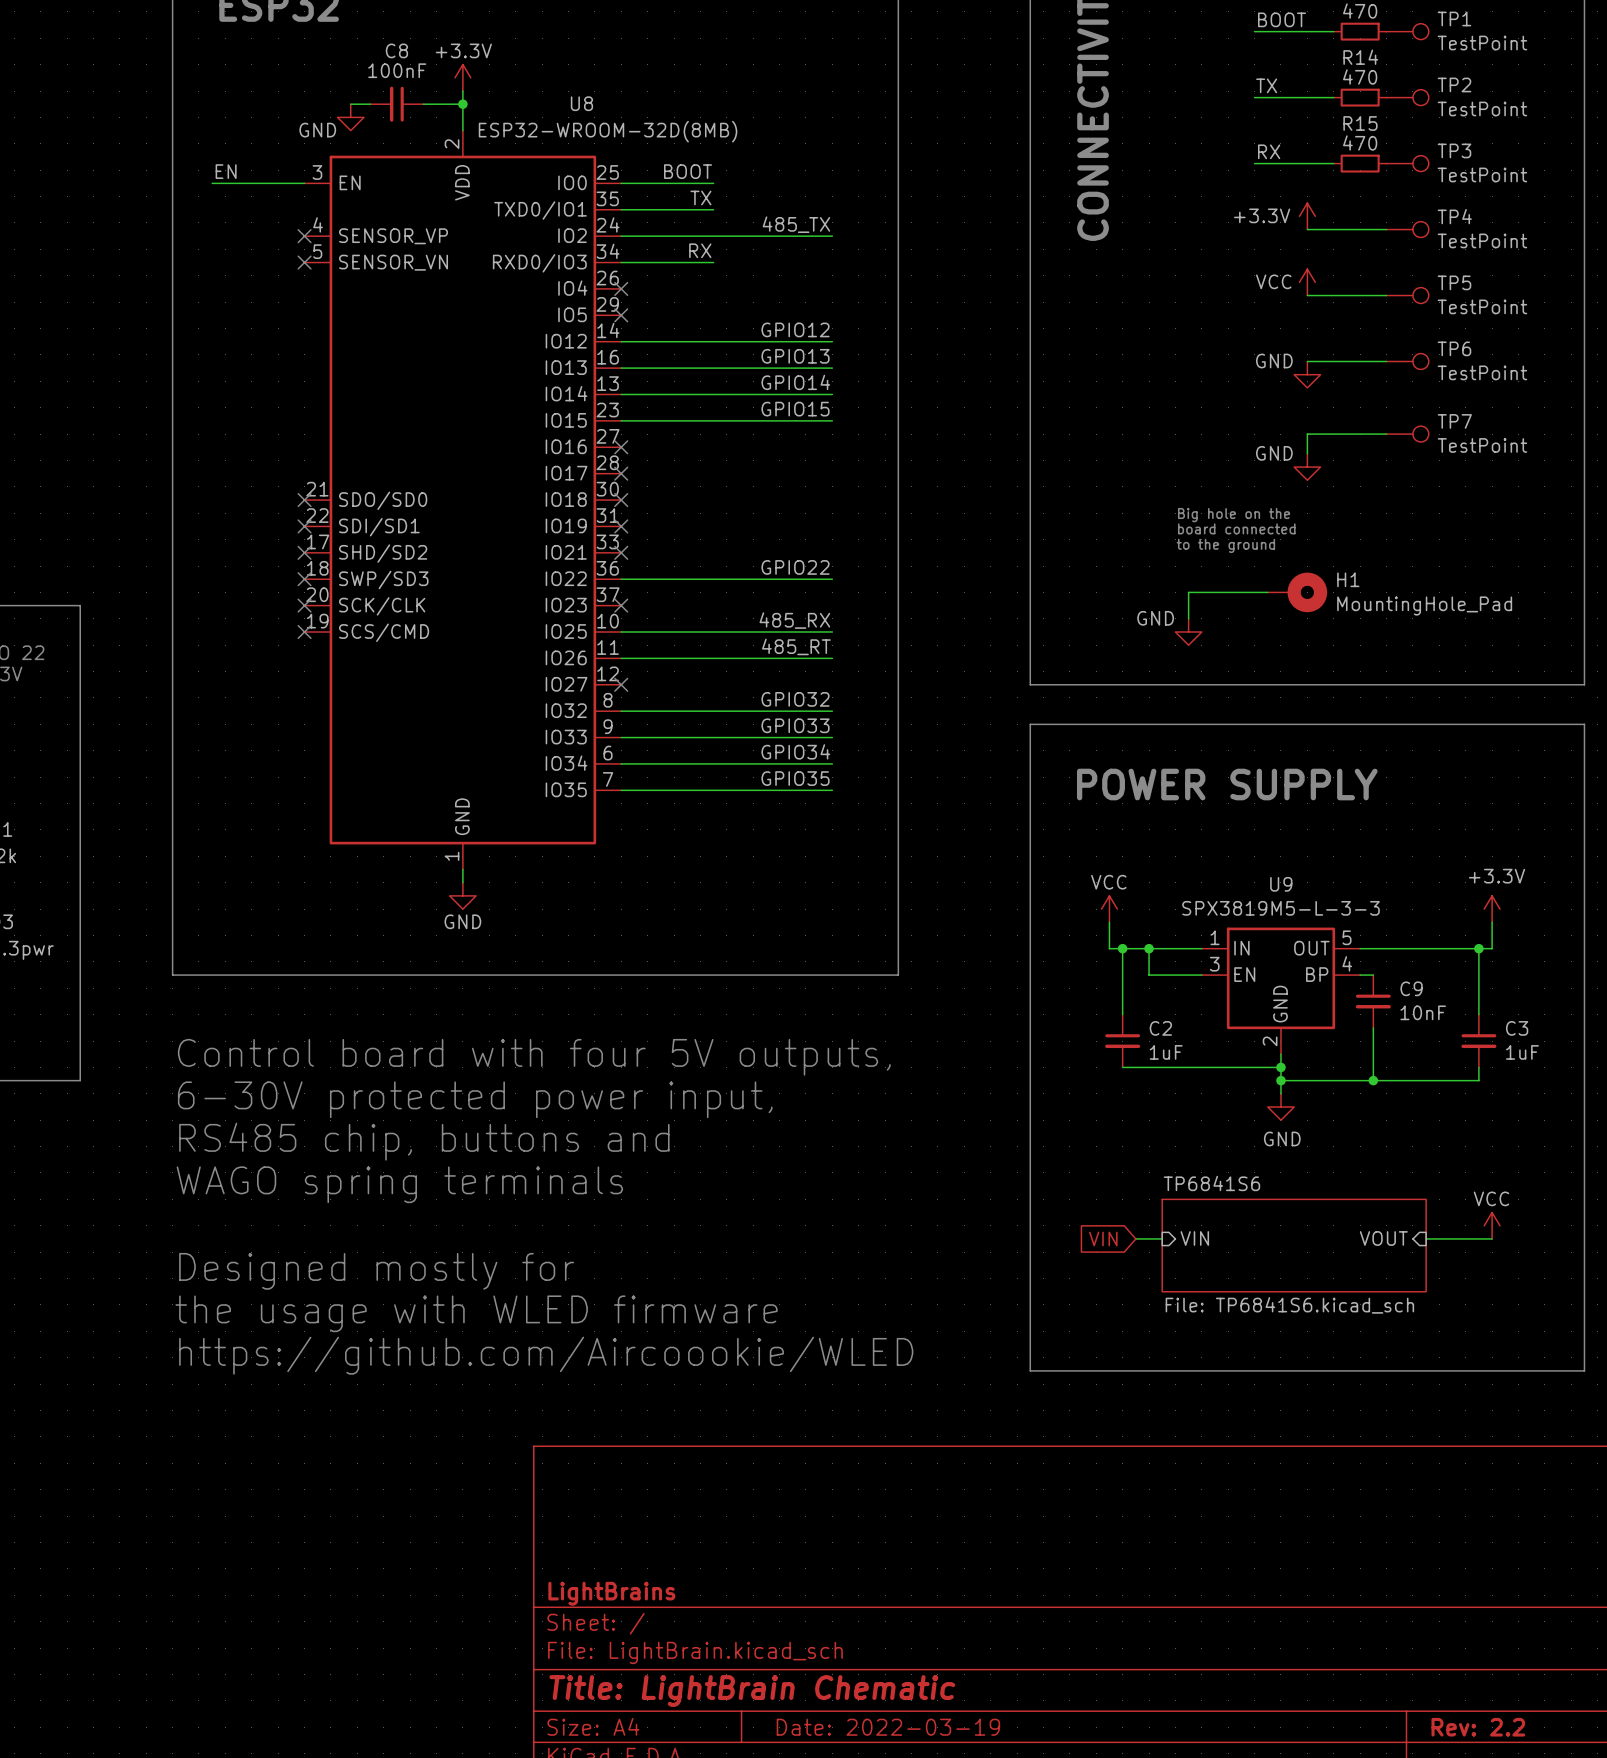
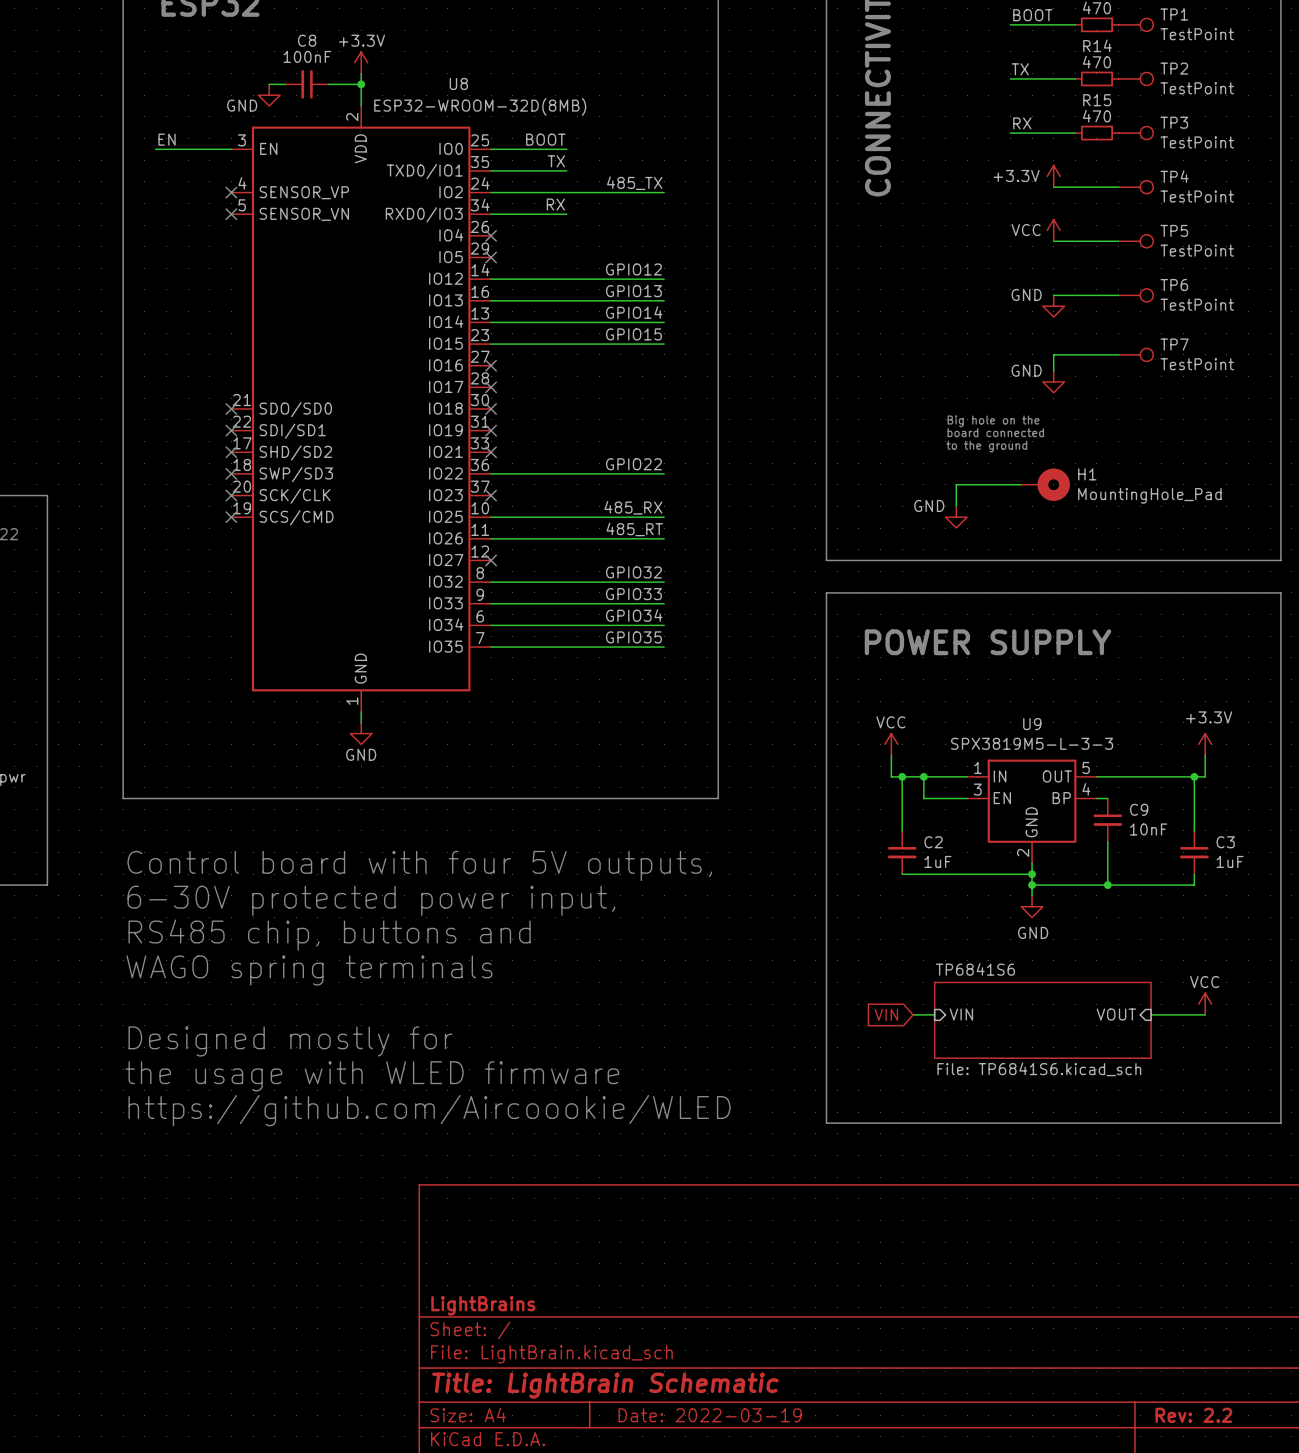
title block: Title: LightBrain Chematic (752, 1691) -> Title: LightBrain Schematic (605, 1385)

